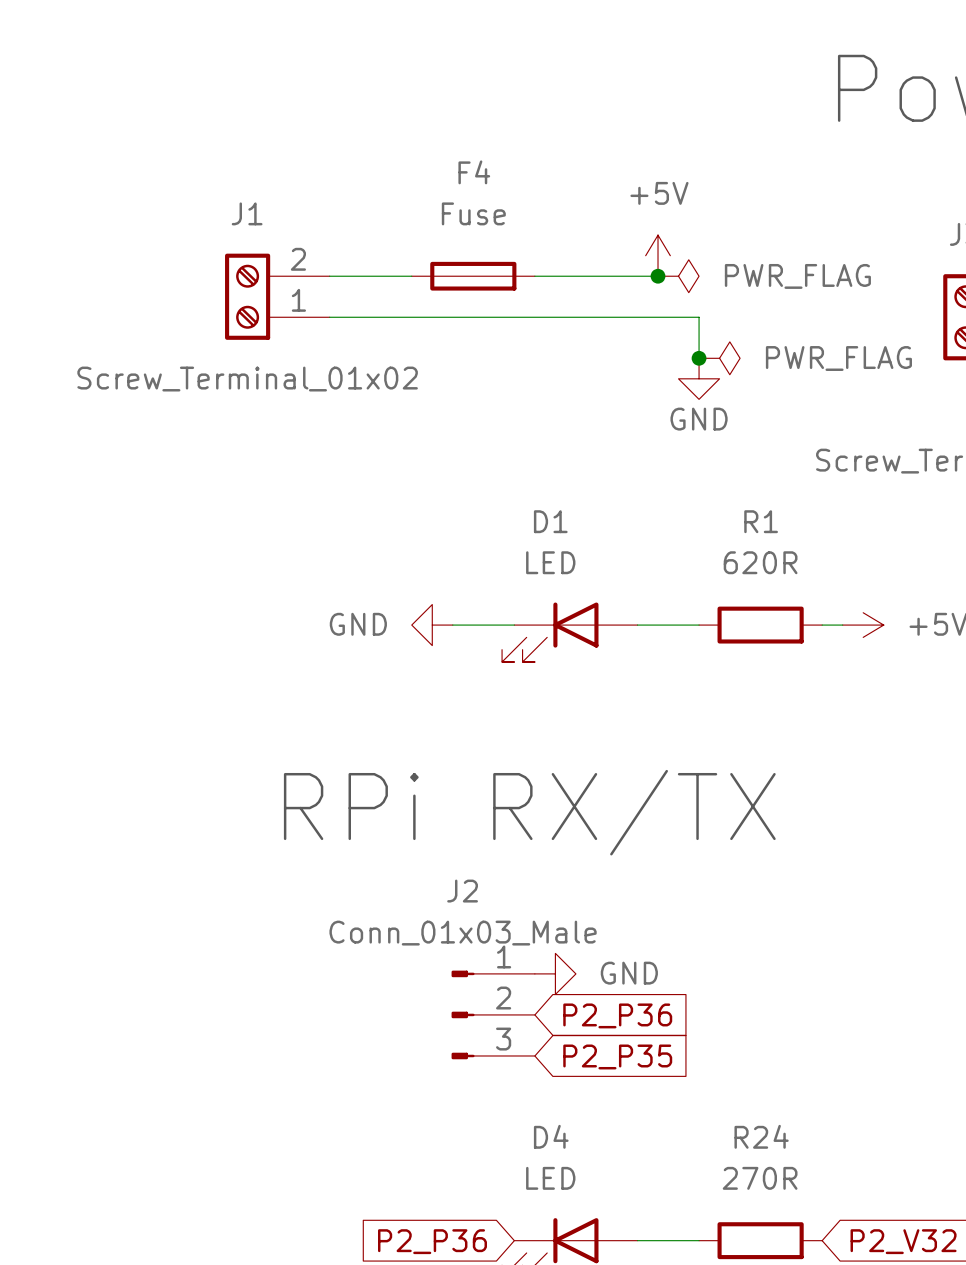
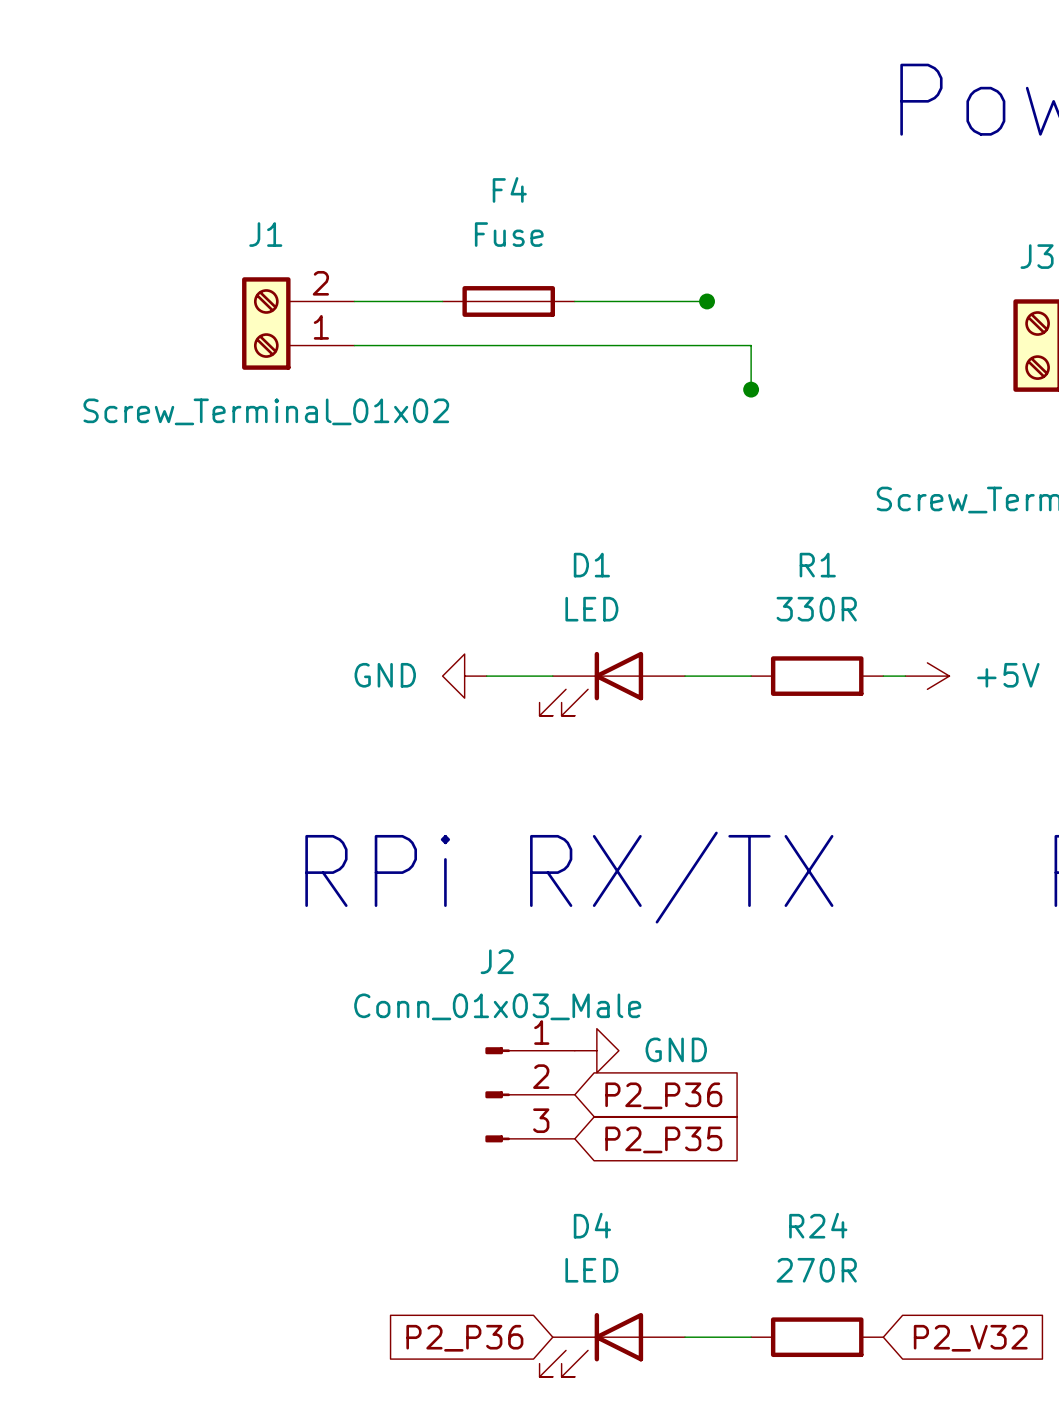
power symbol: +5V (658, 255) -> none
power symbol: PWR_FLAG (678, 276) -> none
power symbol: PWR_FLAG (719, 358) -> none
power symbol: GND (699, 378) -> none
R1 value: 620R (760, 562) -> 330R (816, 609)

